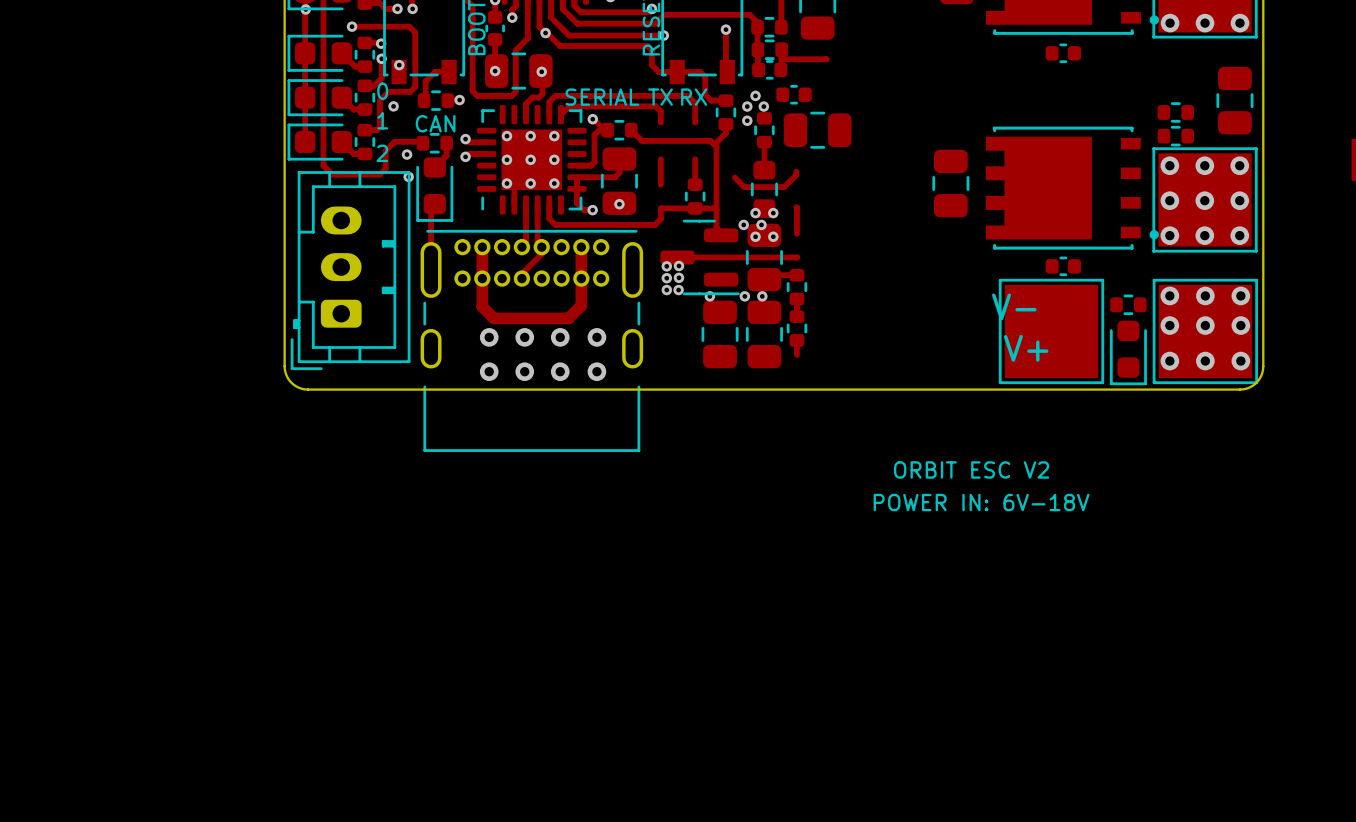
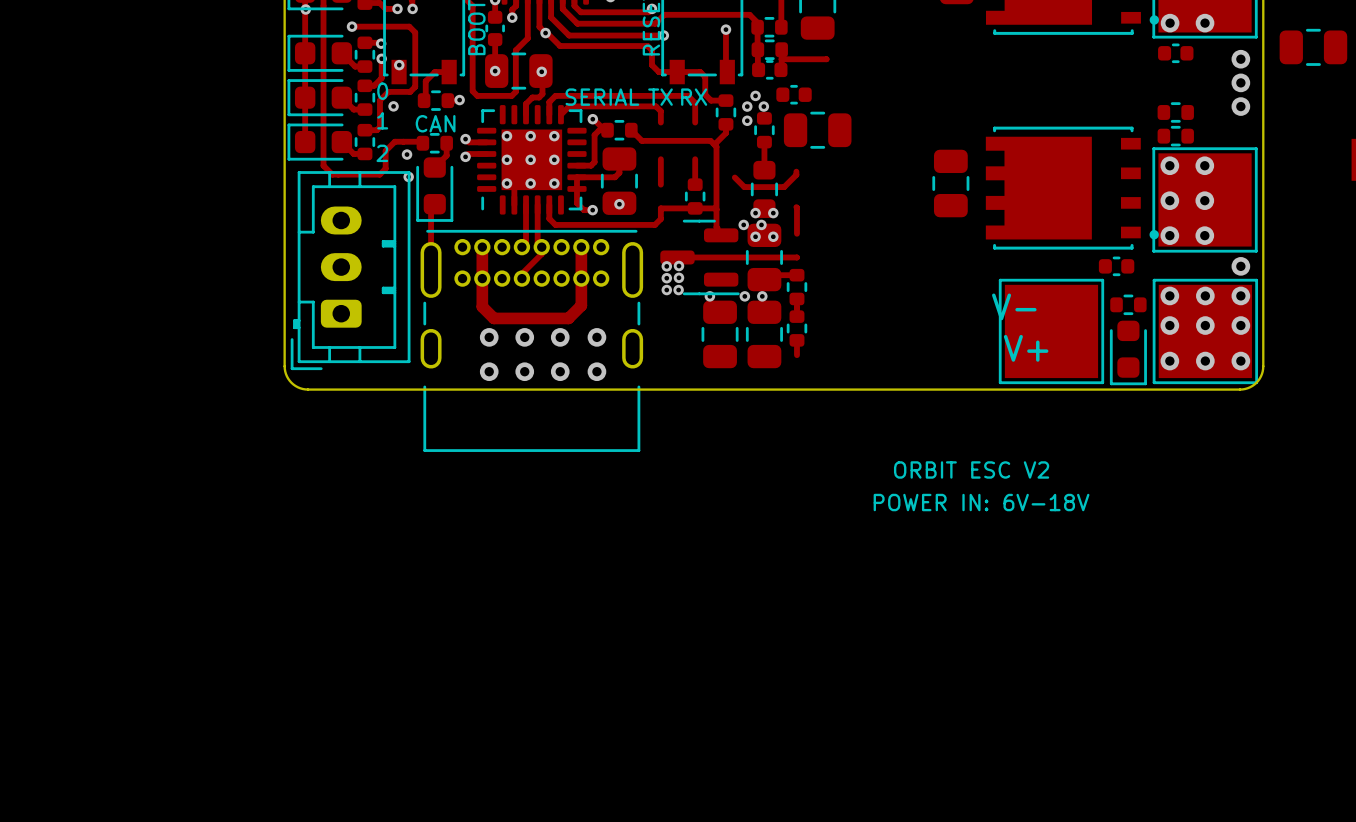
via: (1239, 23) -> none
part: (1063, 53) -> none
part: none -> (1175, 53)
via: none -> (1240, 59)
via: none -> (1240, 82)
part rotation: 0° (1234, 100) -> 90° clockwise (1313, 47)
part position: (1234, 100) -> (1313, 47)
via: none -> (1240, 106)
via: (1239, 165) -> none
via: (1239, 200) -> none
via position: (1239, 235) -> (1240, 266)
part position: (1063, 266) -> (1116, 266)

